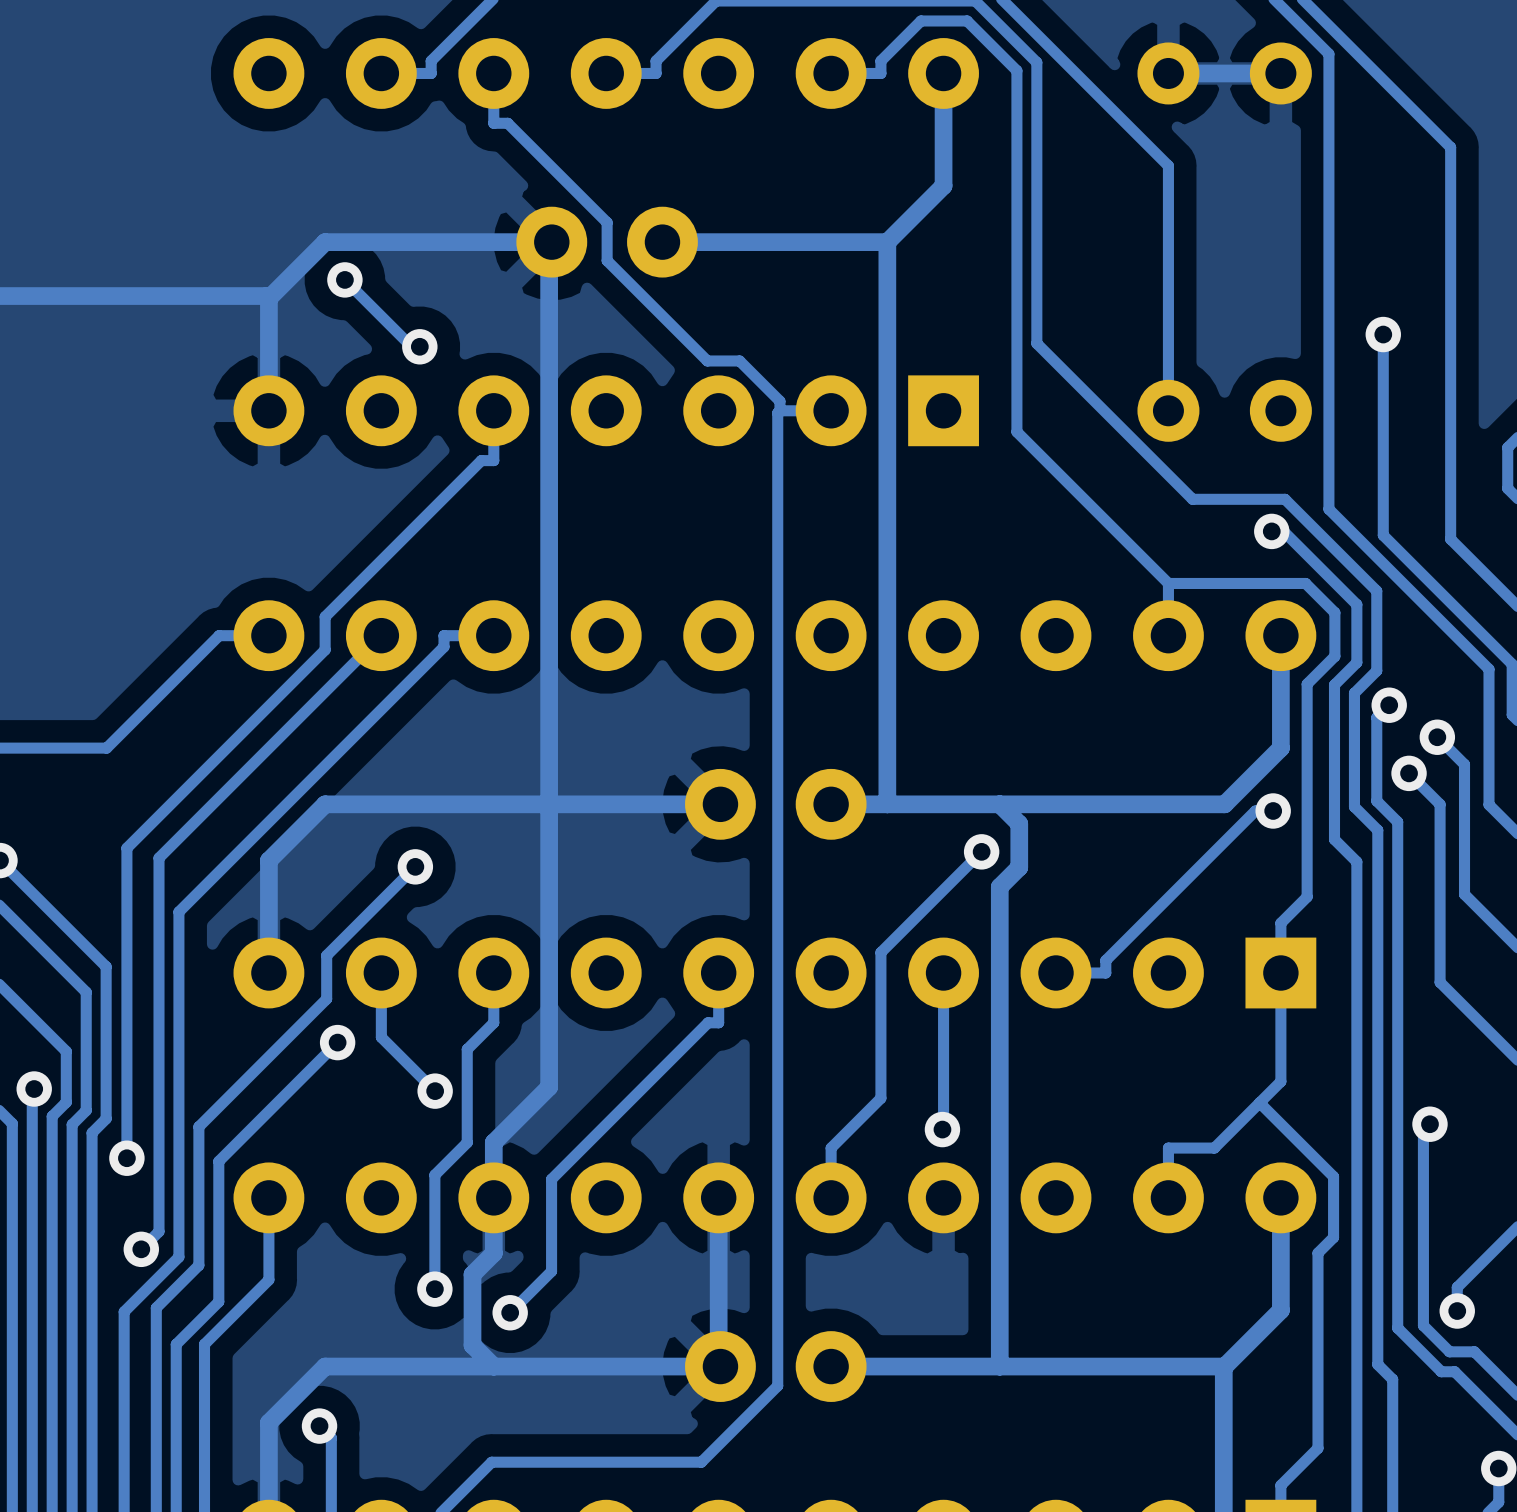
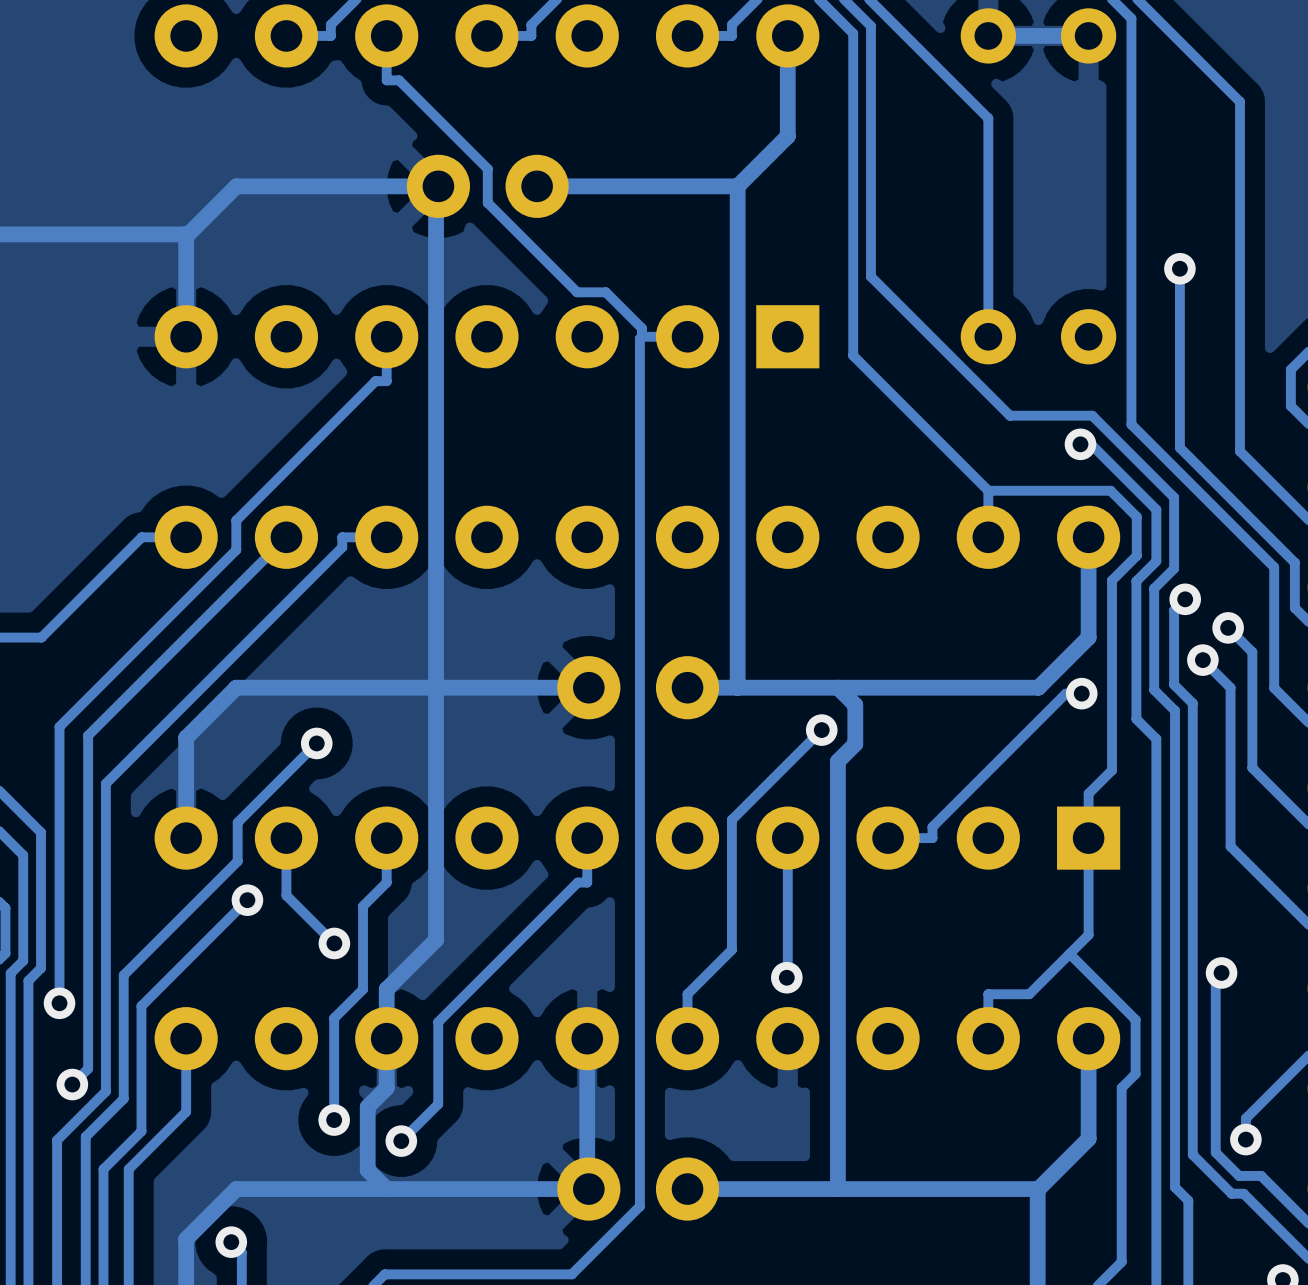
track: (344, 279) (411, 346) (419, 346) -> none
via: (344, 279) -> none
via: (419, 346) -> none

